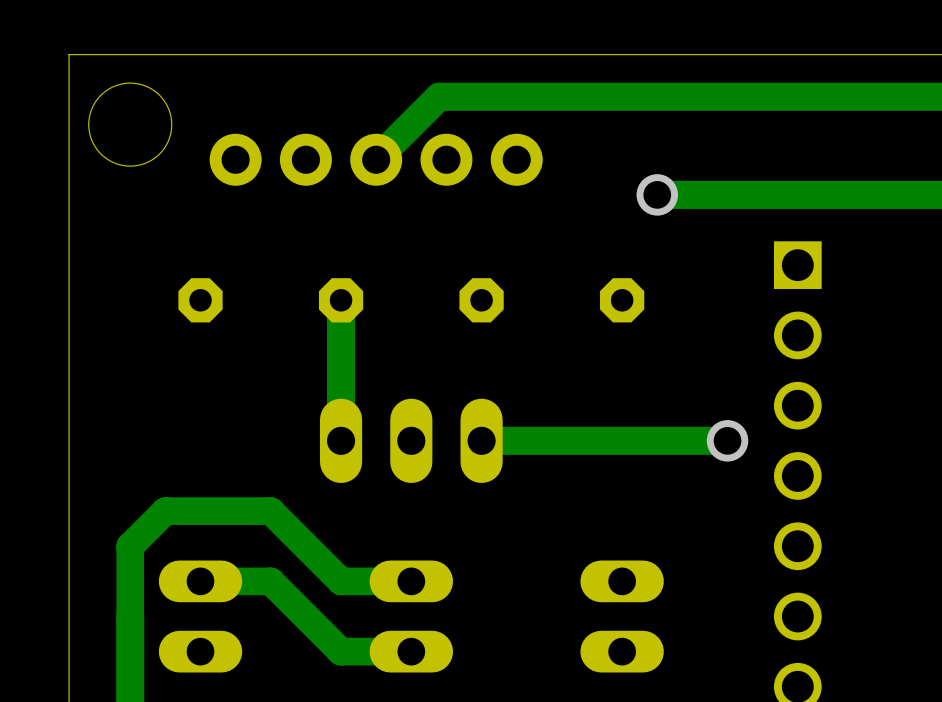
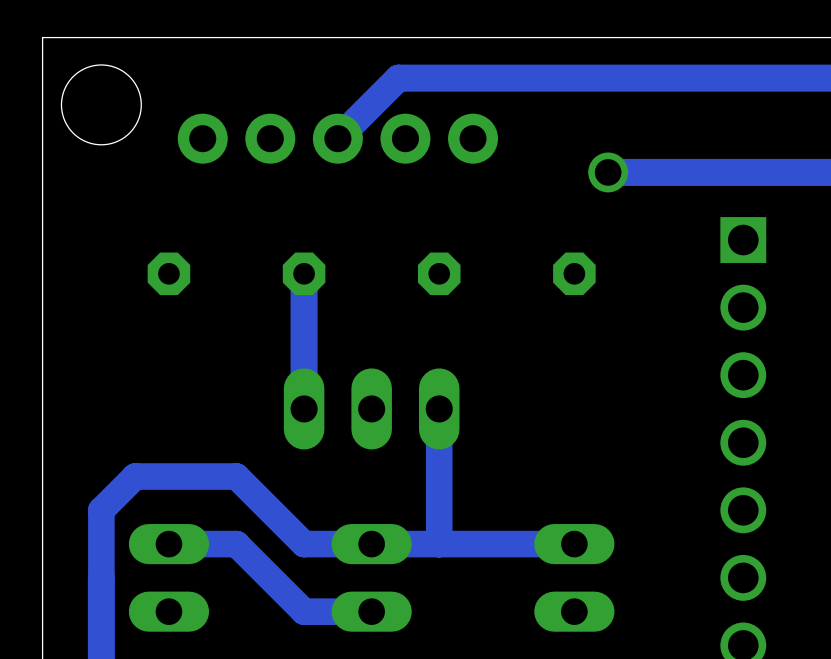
track: (727, 440) (481, 440) -> (439, 544) (439, 408)
via: (727, 440) -> none
track: none -> (574, 544) (371, 544)

